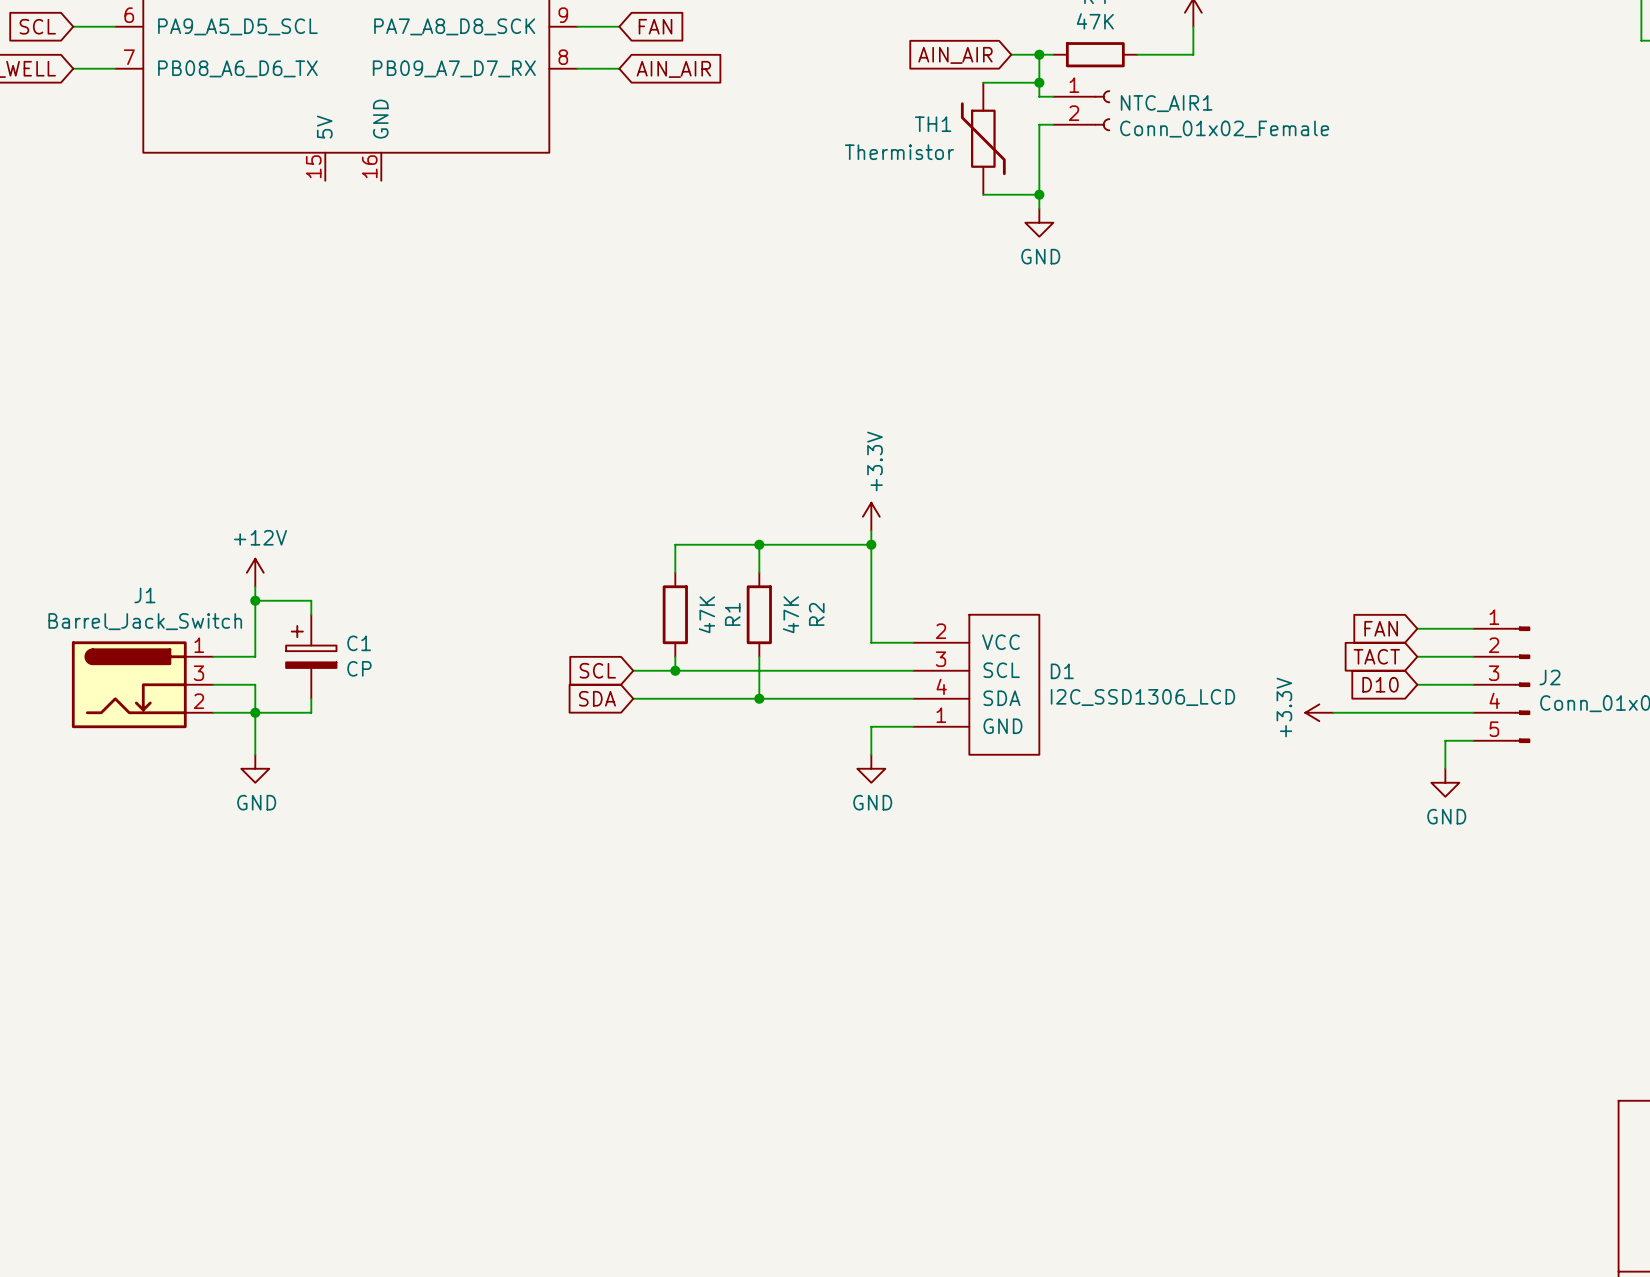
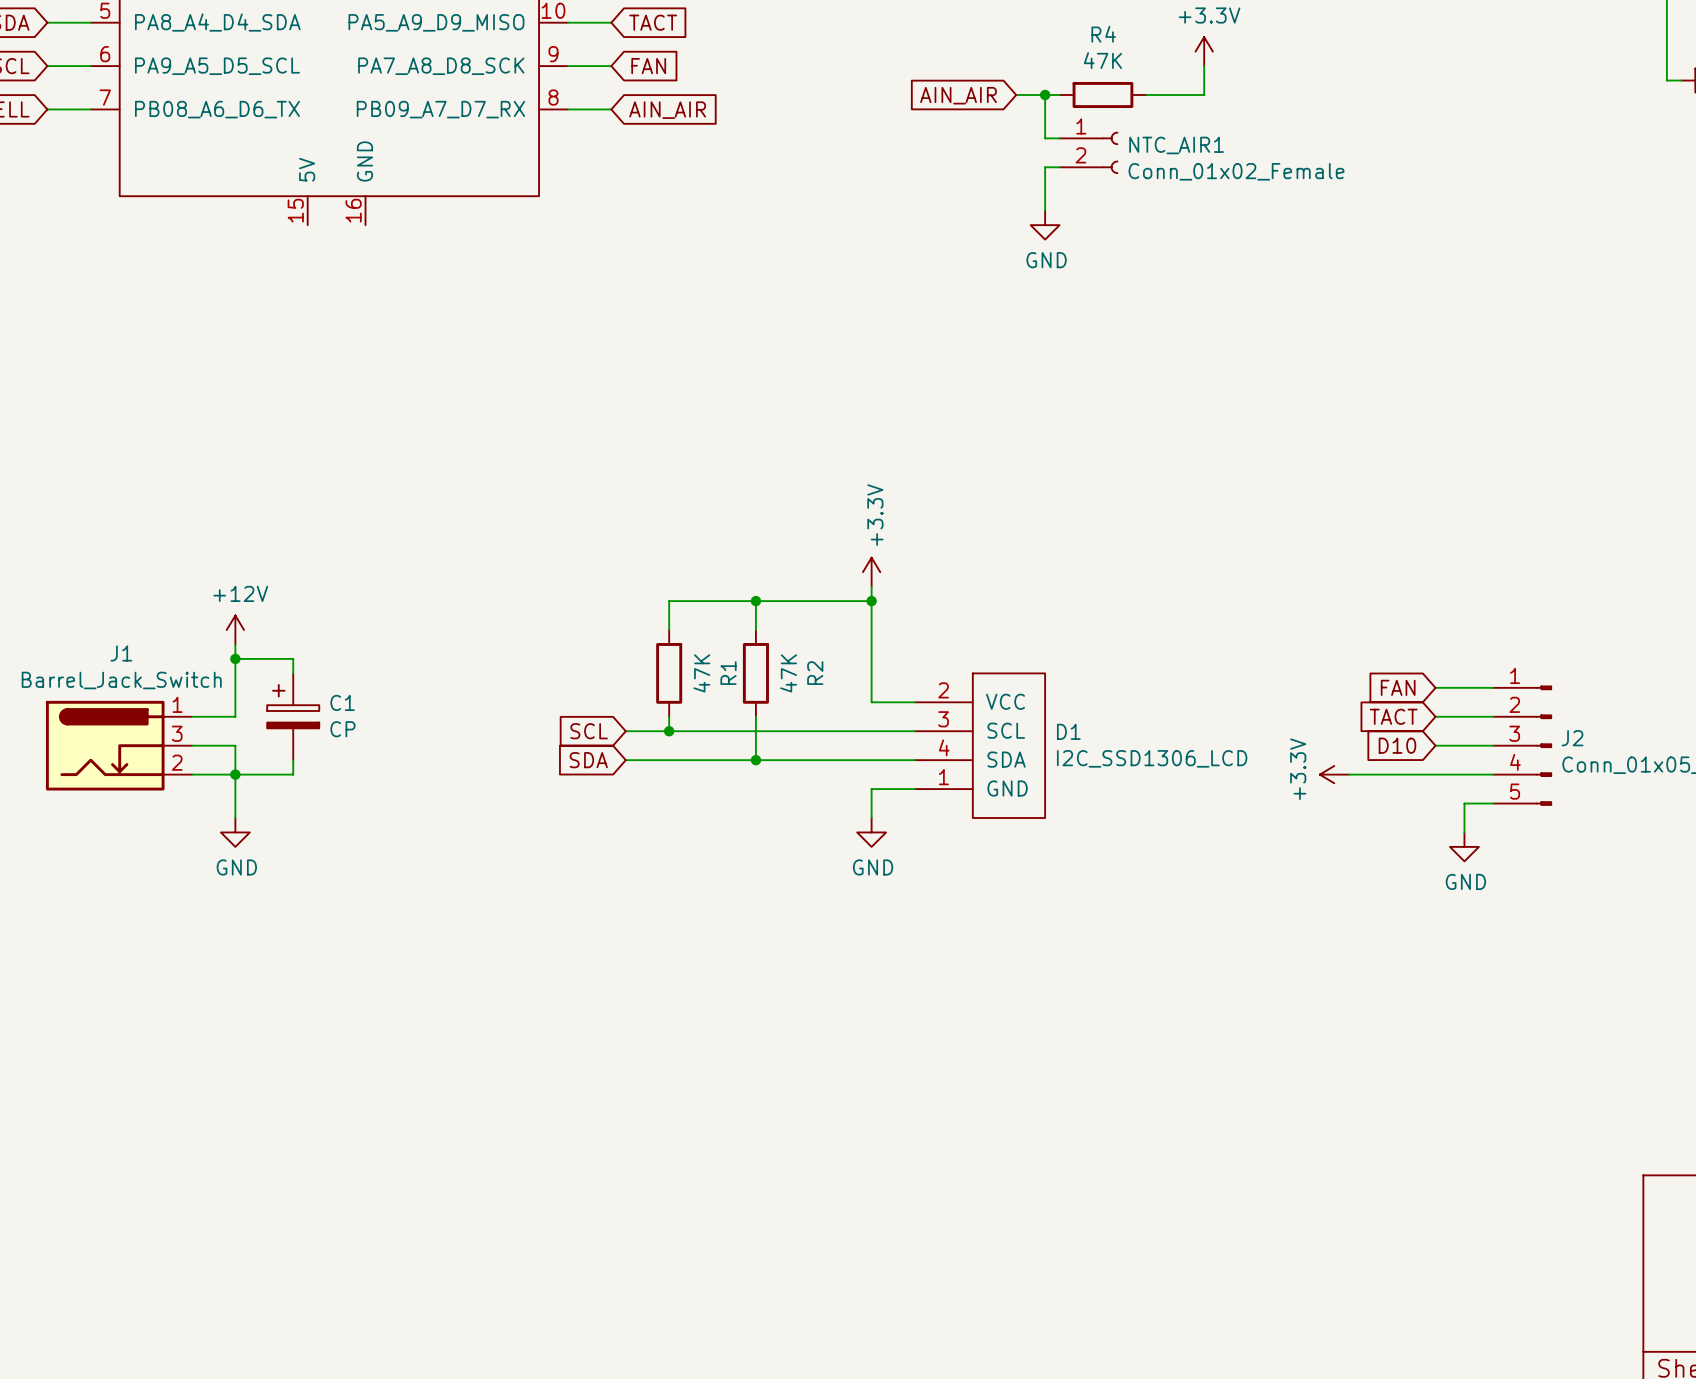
wire: (983, 82) (1039, 82) -> none
junction: (1039, 82) -> none
TH1: Thermistor (983, 138) -> none
wire: (1039, 166) (1039, 208) -> none
wire: (983, 194) (1039, 194) -> none
junction: (1039, 194) -> none
power symbol position: GND (1039, 222) -> GND (1045, 225)

